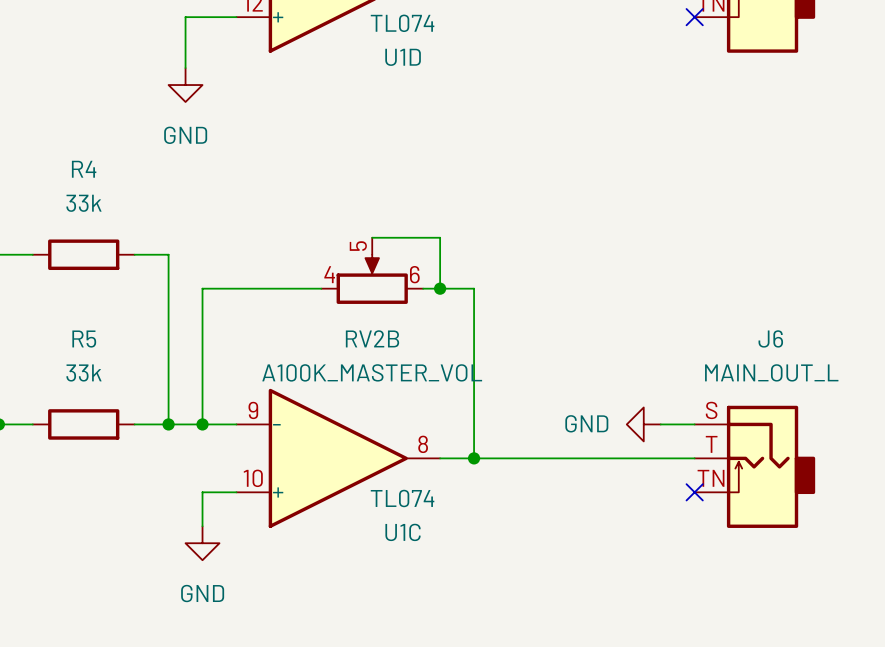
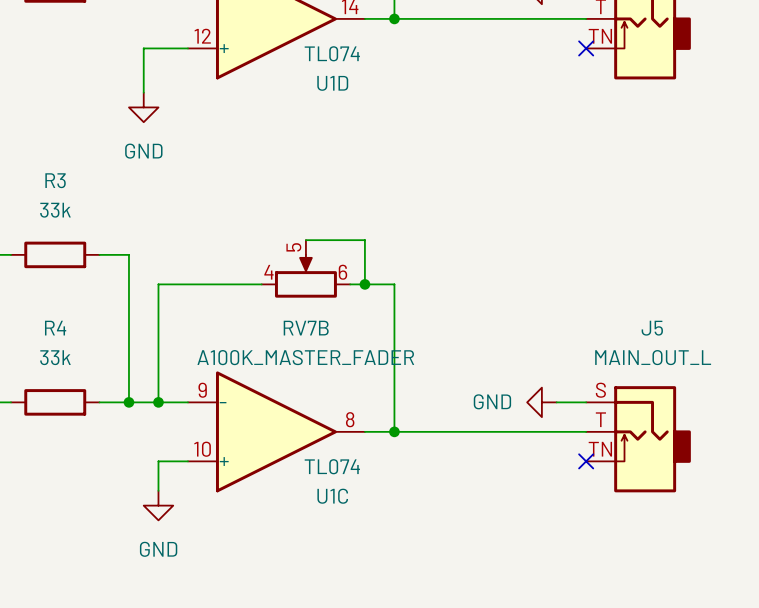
R4 name: R4 (84, 169) -> R3 (55, 180)
RV2B name: RV2B (372, 338) -> RV7B (306, 328)
J6 name: J6 (770, 338) -> J5 (652, 328)
R5 name: R5 (84, 339) -> R4 (55, 328)
RV2B value: A100K_MASTER_VOL (372, 372) -> A100K_MASTER_FADER (305, 357)

